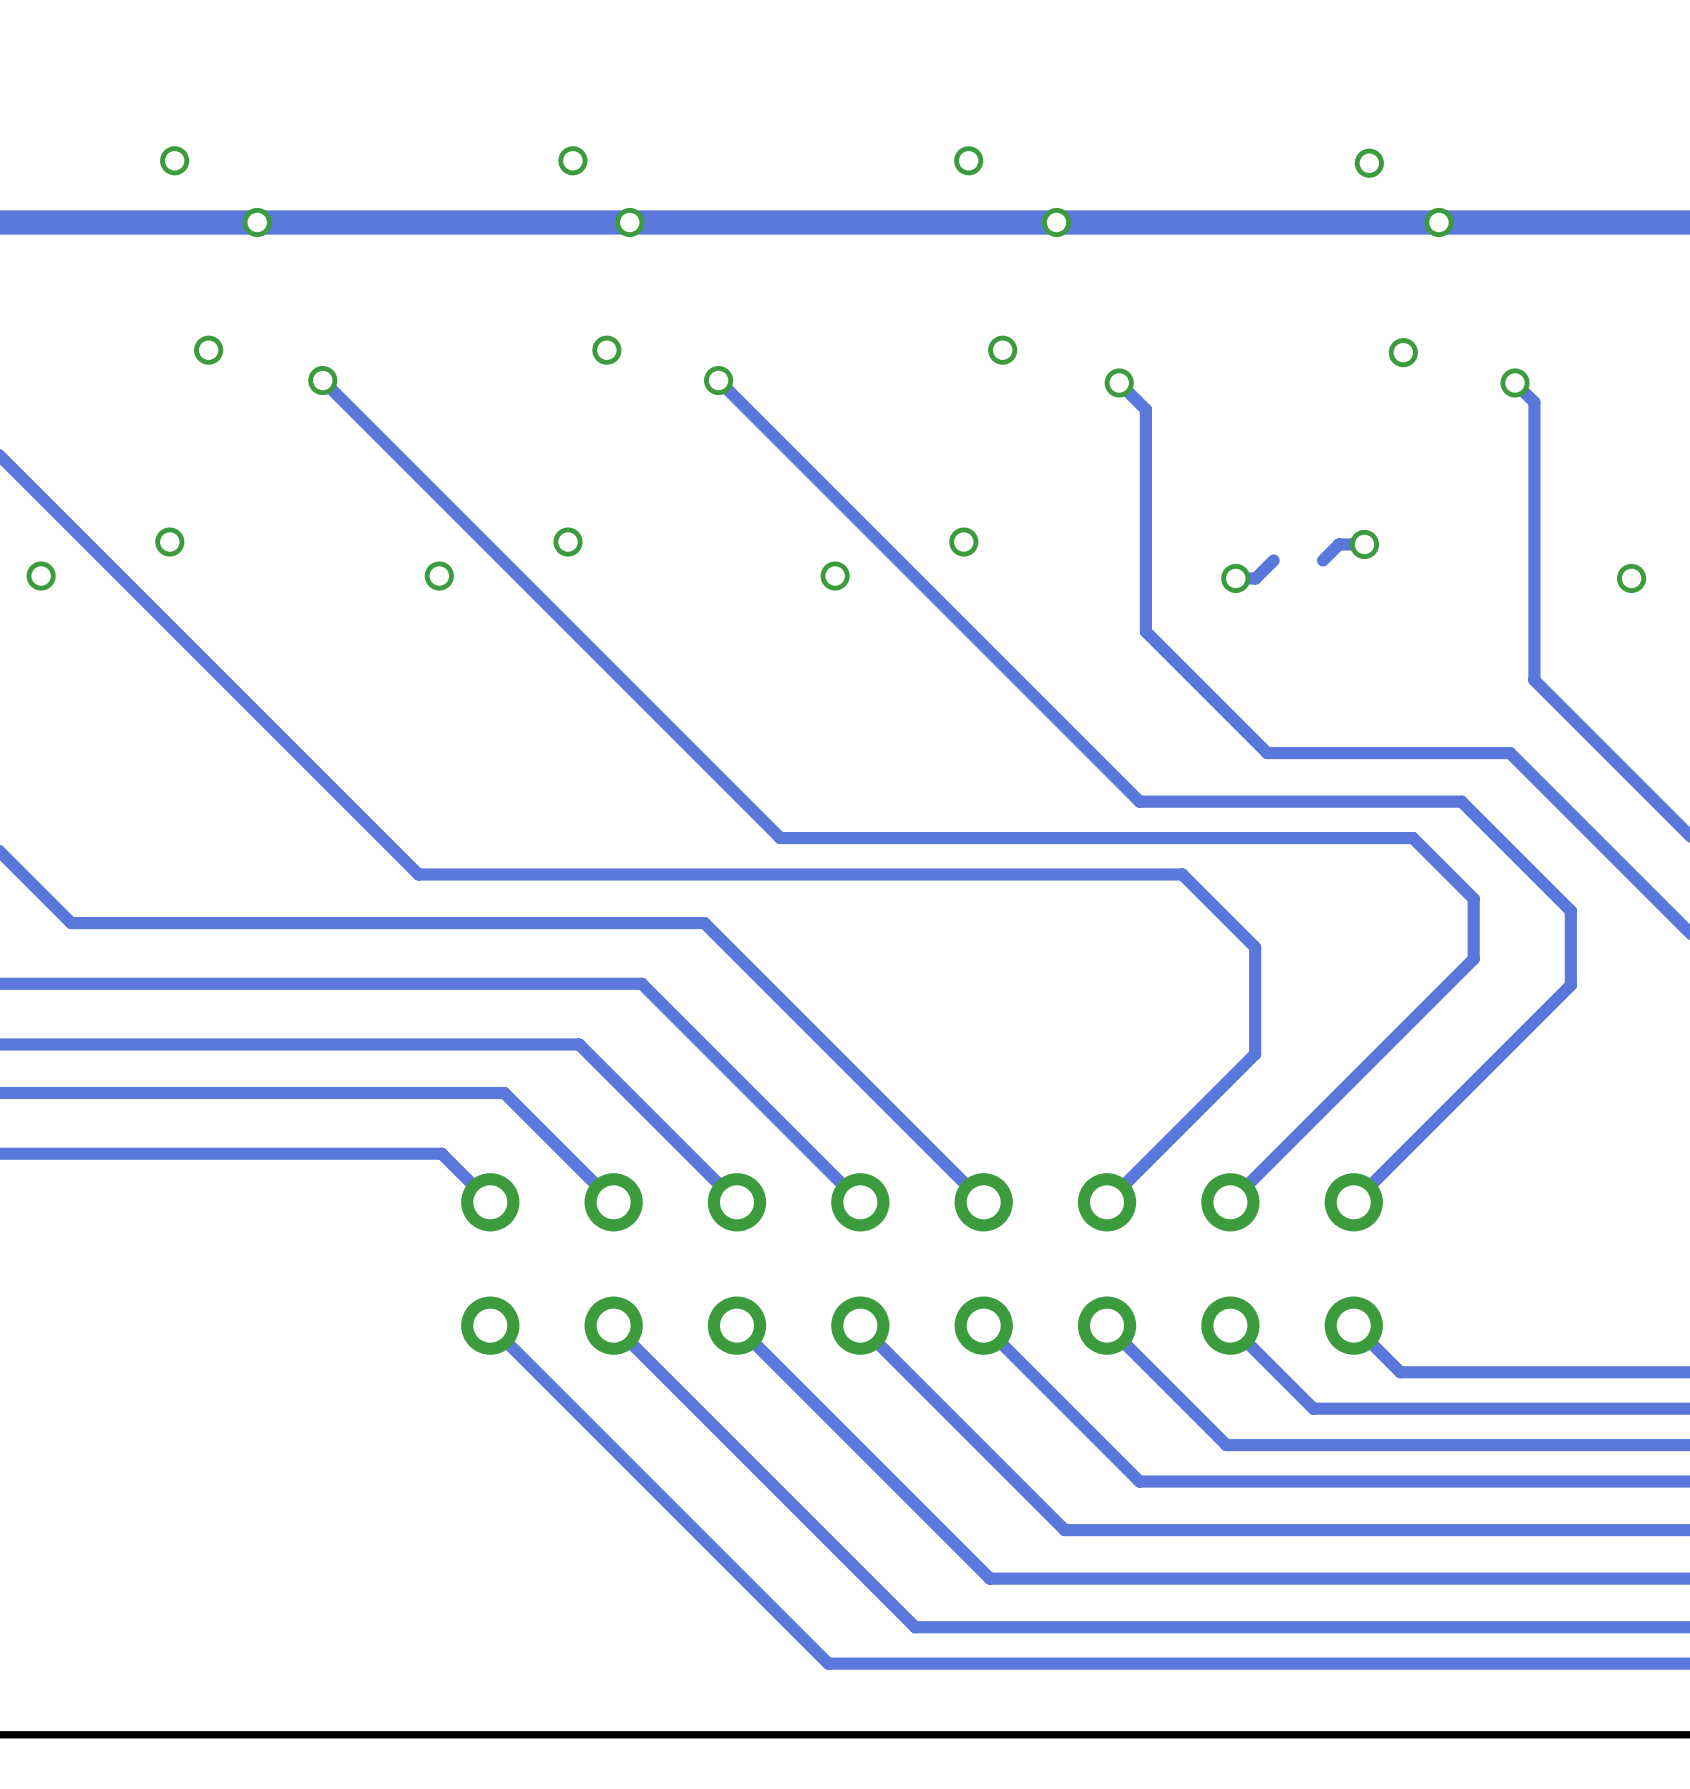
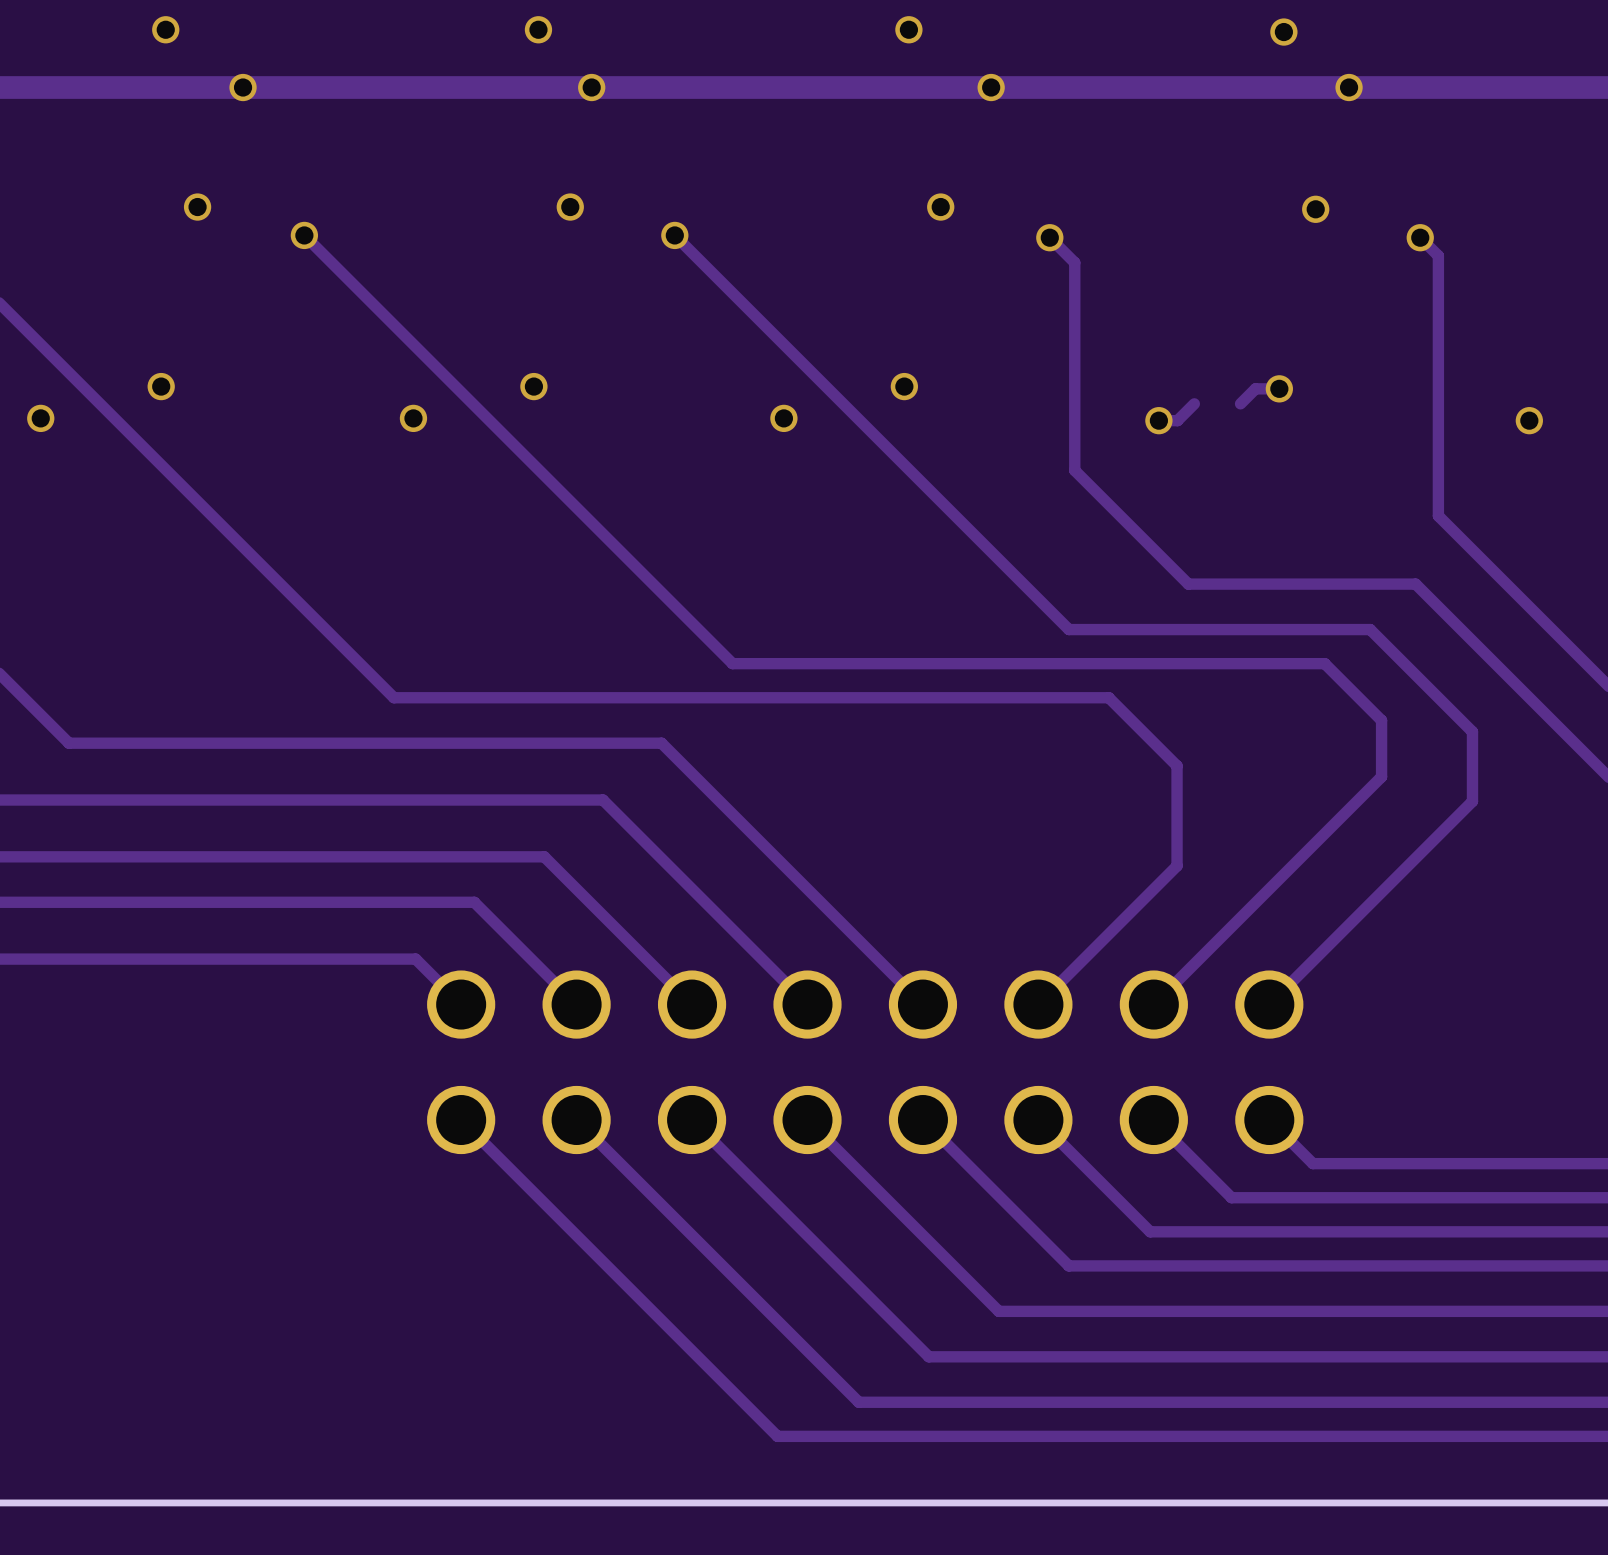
part footprint: [461, 1173, 1383, 1355] -> [427, 970, 1304, 1155]

